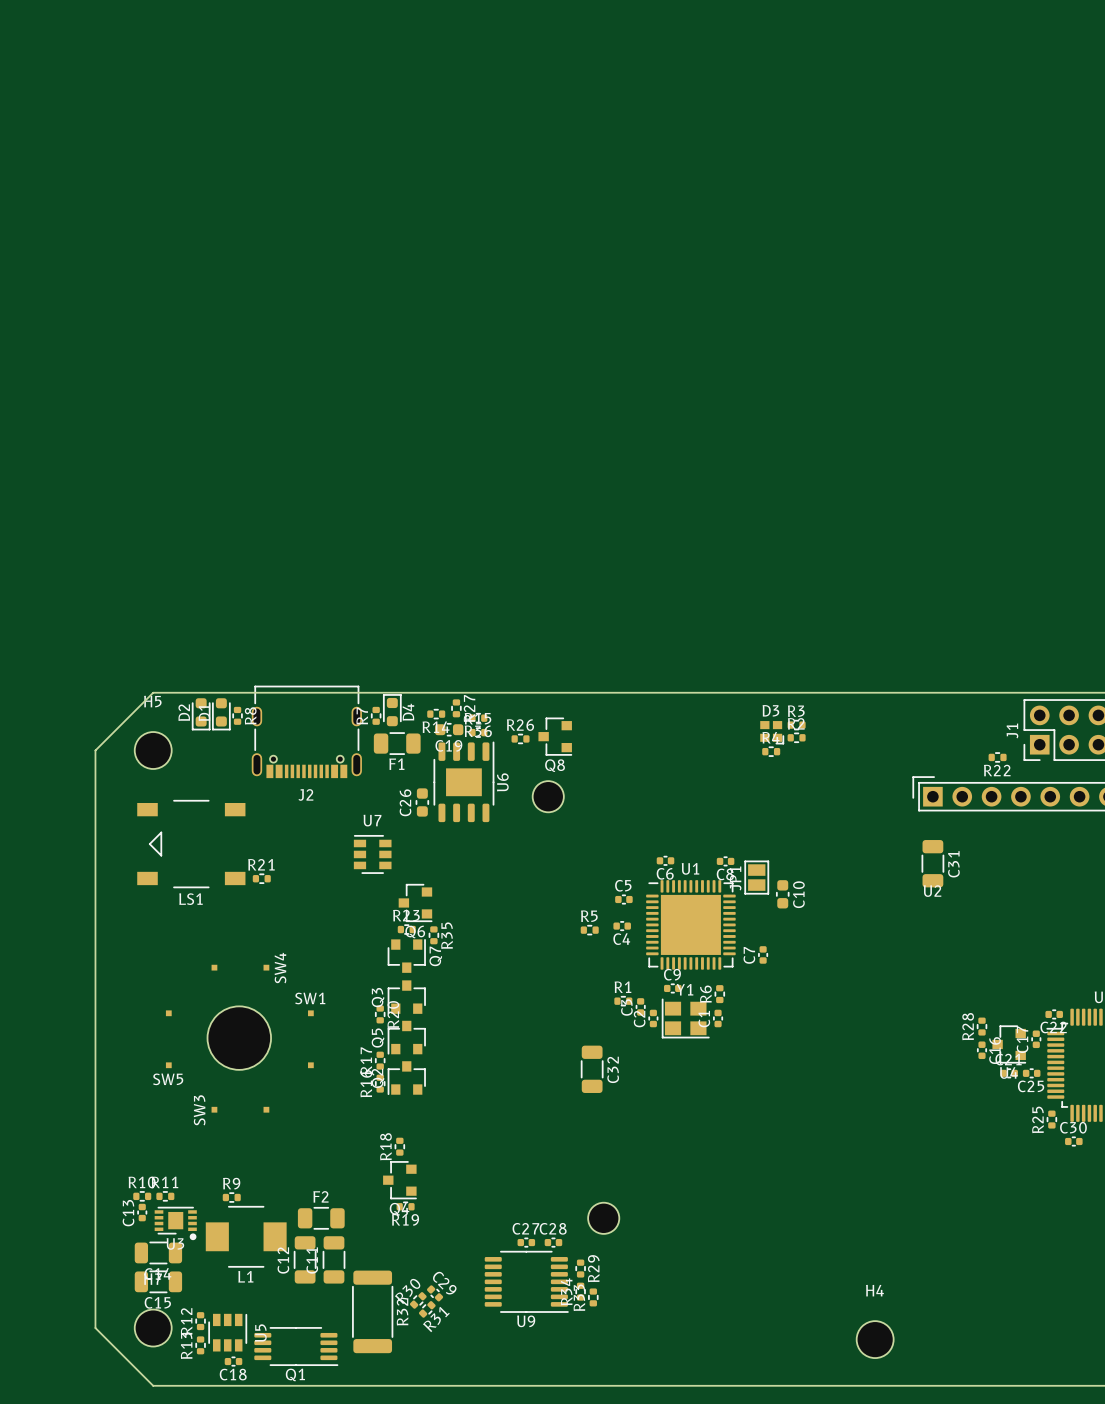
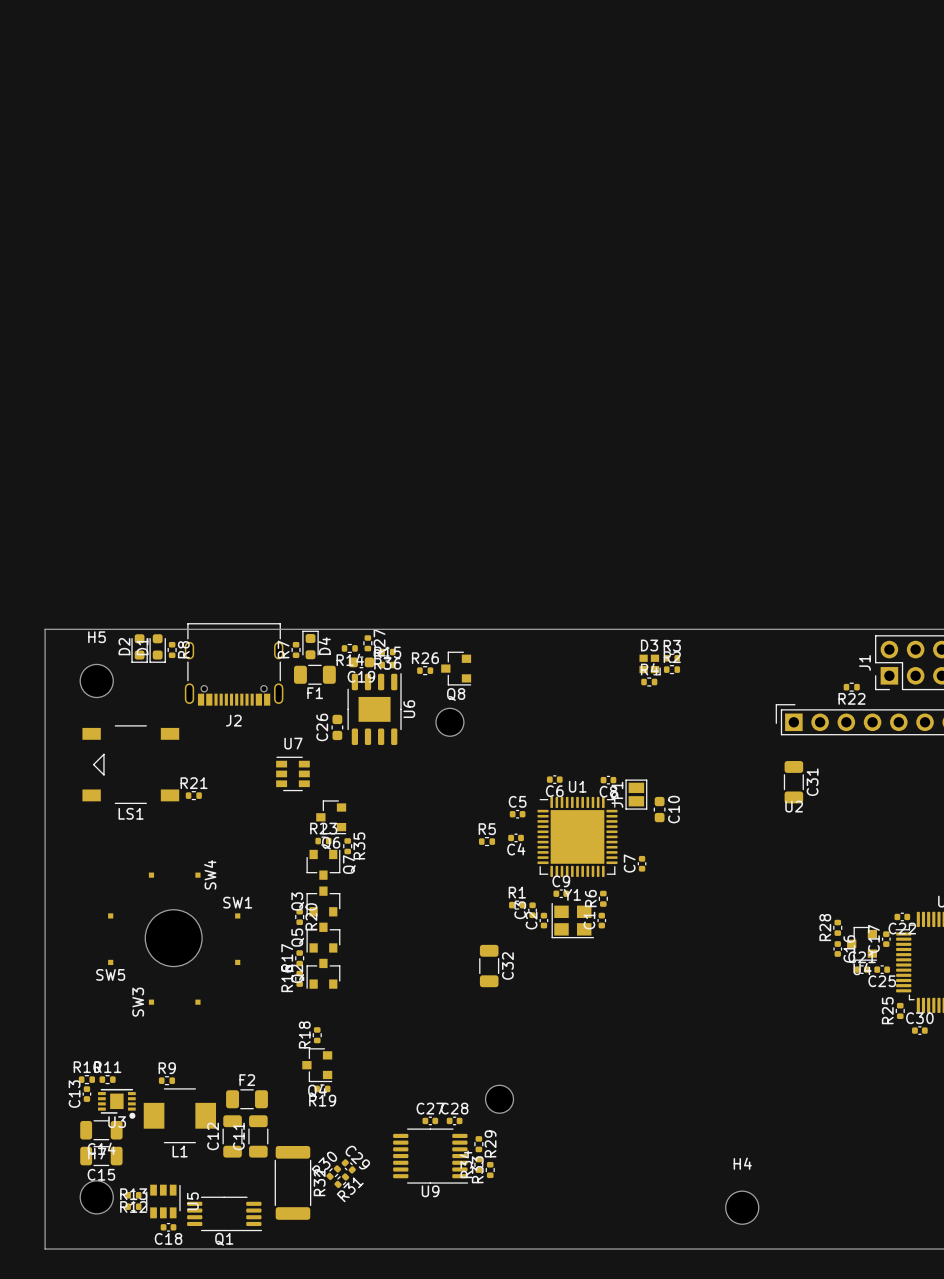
board edge: (153, 692) (95, 750) -> (96, 629) (45, 629) (45, 680)
R12 rotation: 0° (200, 1321) -> 90° clockwise (133, 1195)
board edge: (95, 1328) (153, 1385) -> (45, 1197) (45, 1249) (96, 1249)
R13 rotation: 0° (200, 1345) -> 90° clockwise (133, 1206)

